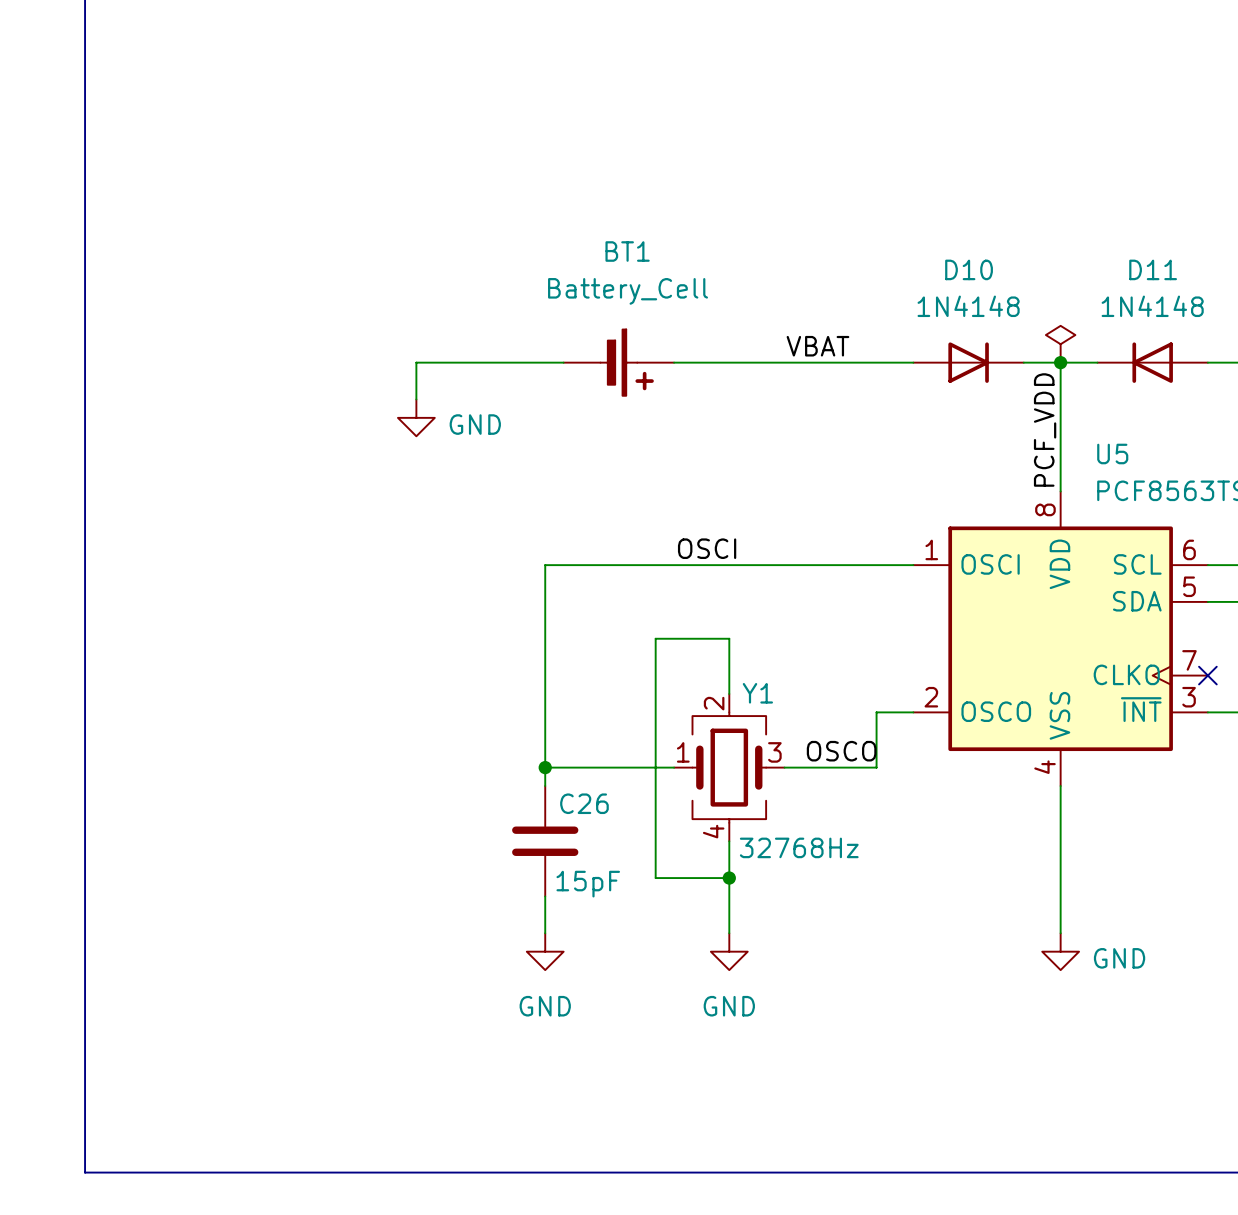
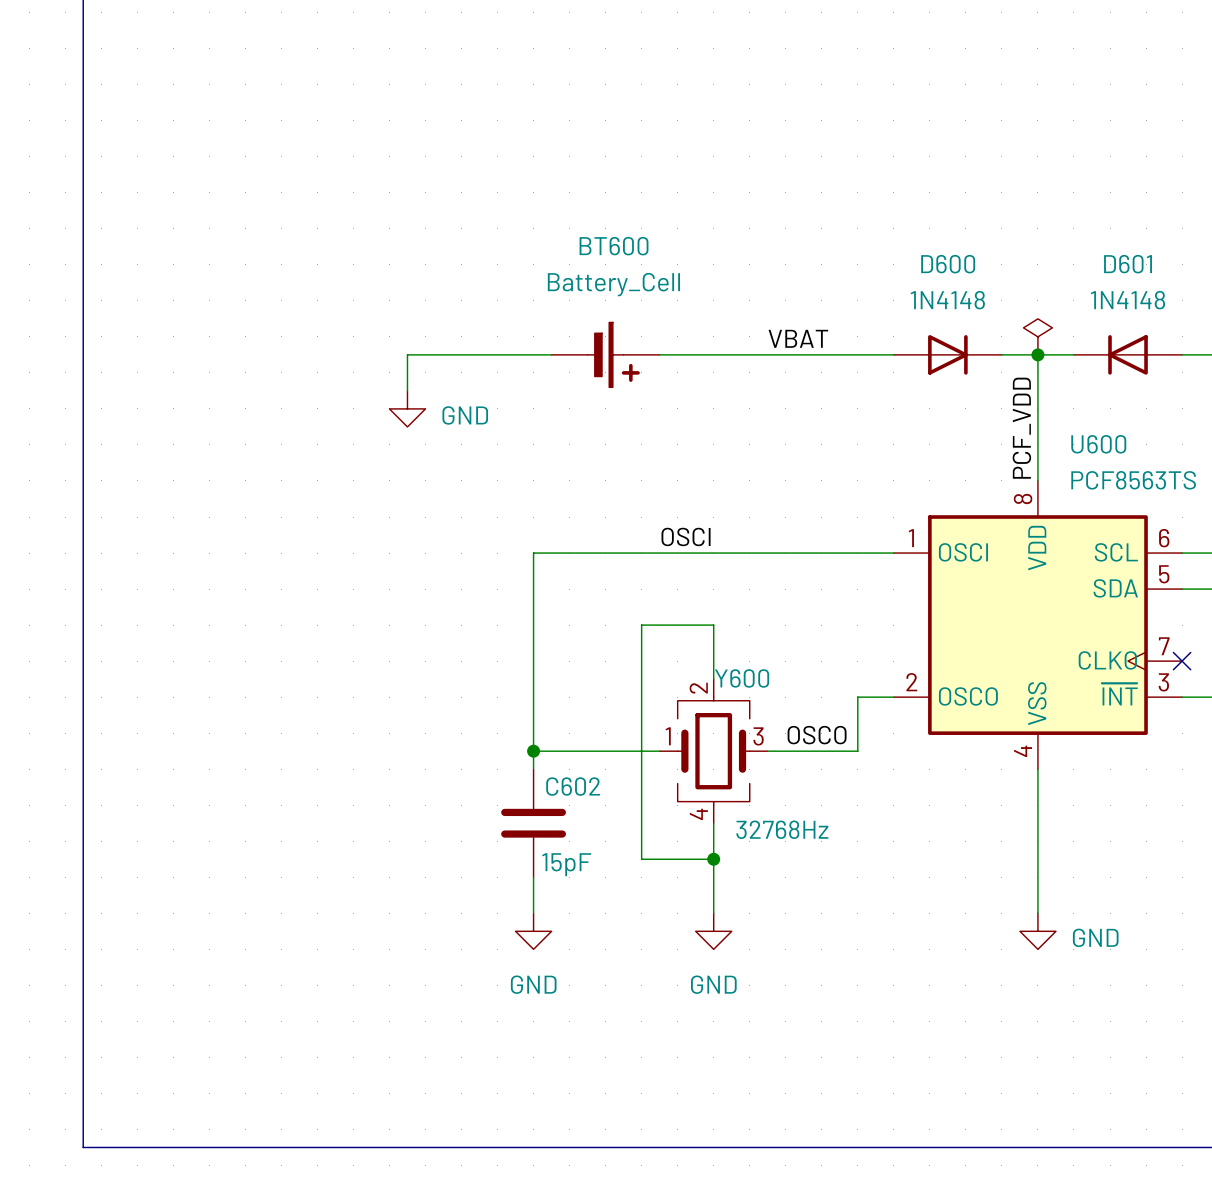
BT1 name: BT1 (627, 251) -> BT600 (614, 246)
D10 name: D10 (969, 269) -> D600 (948, 264)
D11 name: D11 (1153, 269) -> D601 (1128, 264)
U5 name: U5 (1112, 453) -> U600 (1098, 444)
Y1 name: Y1 (757, 693) -> Y600 (742, 678)
C26 name: C26 (584, 803) -> C602 (573, 786)

